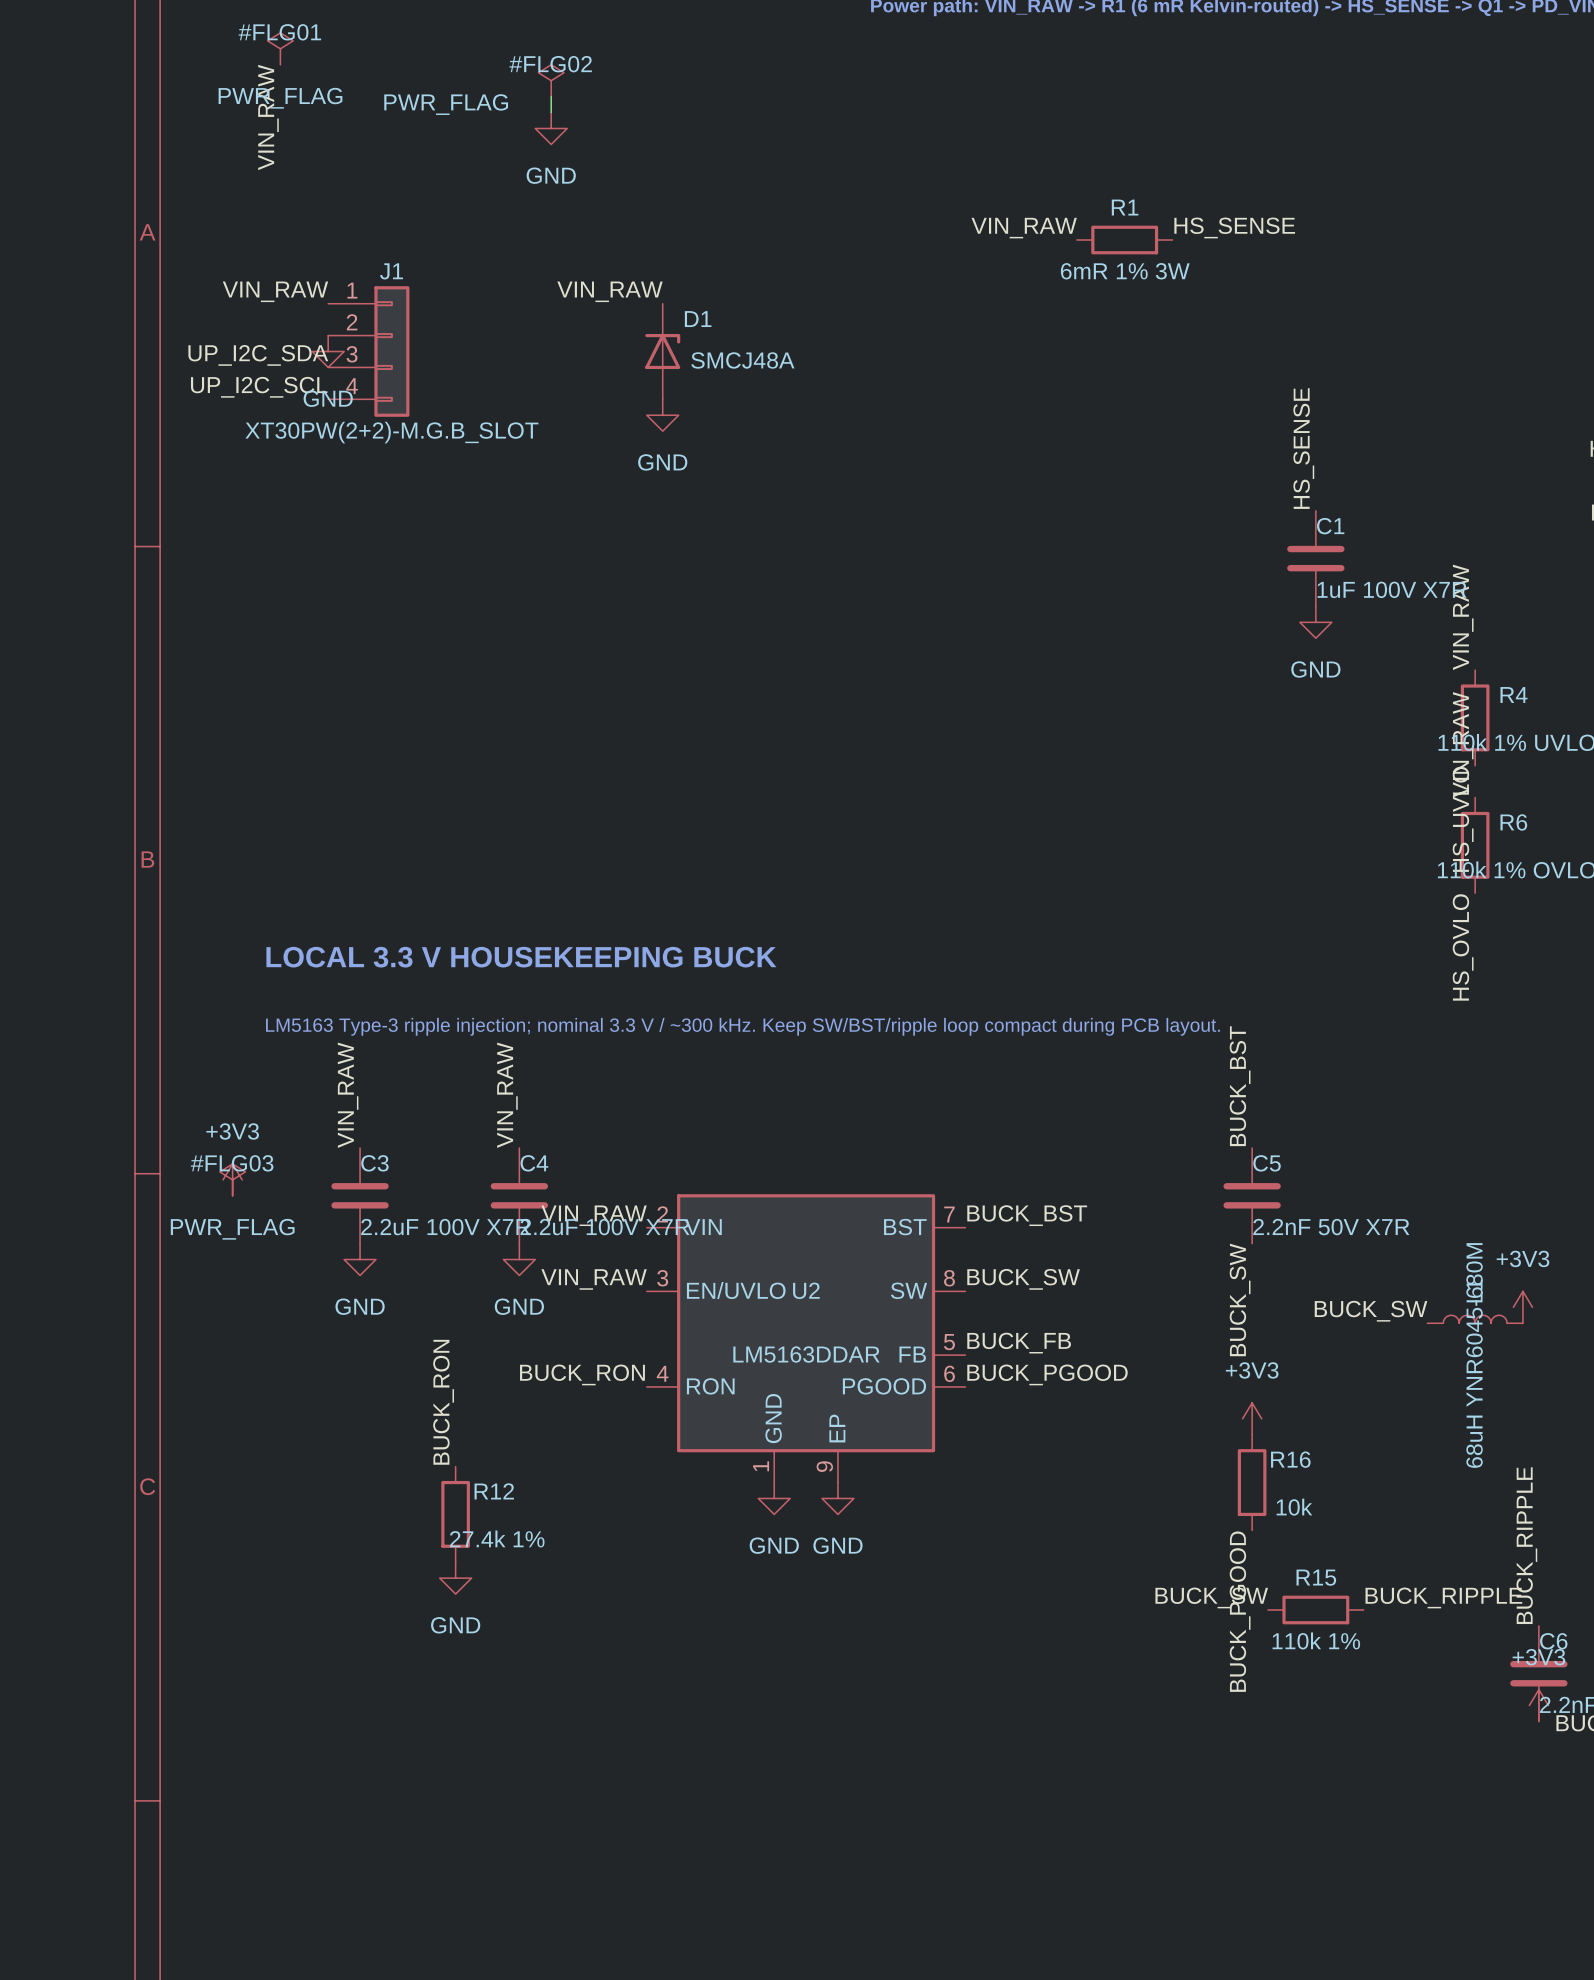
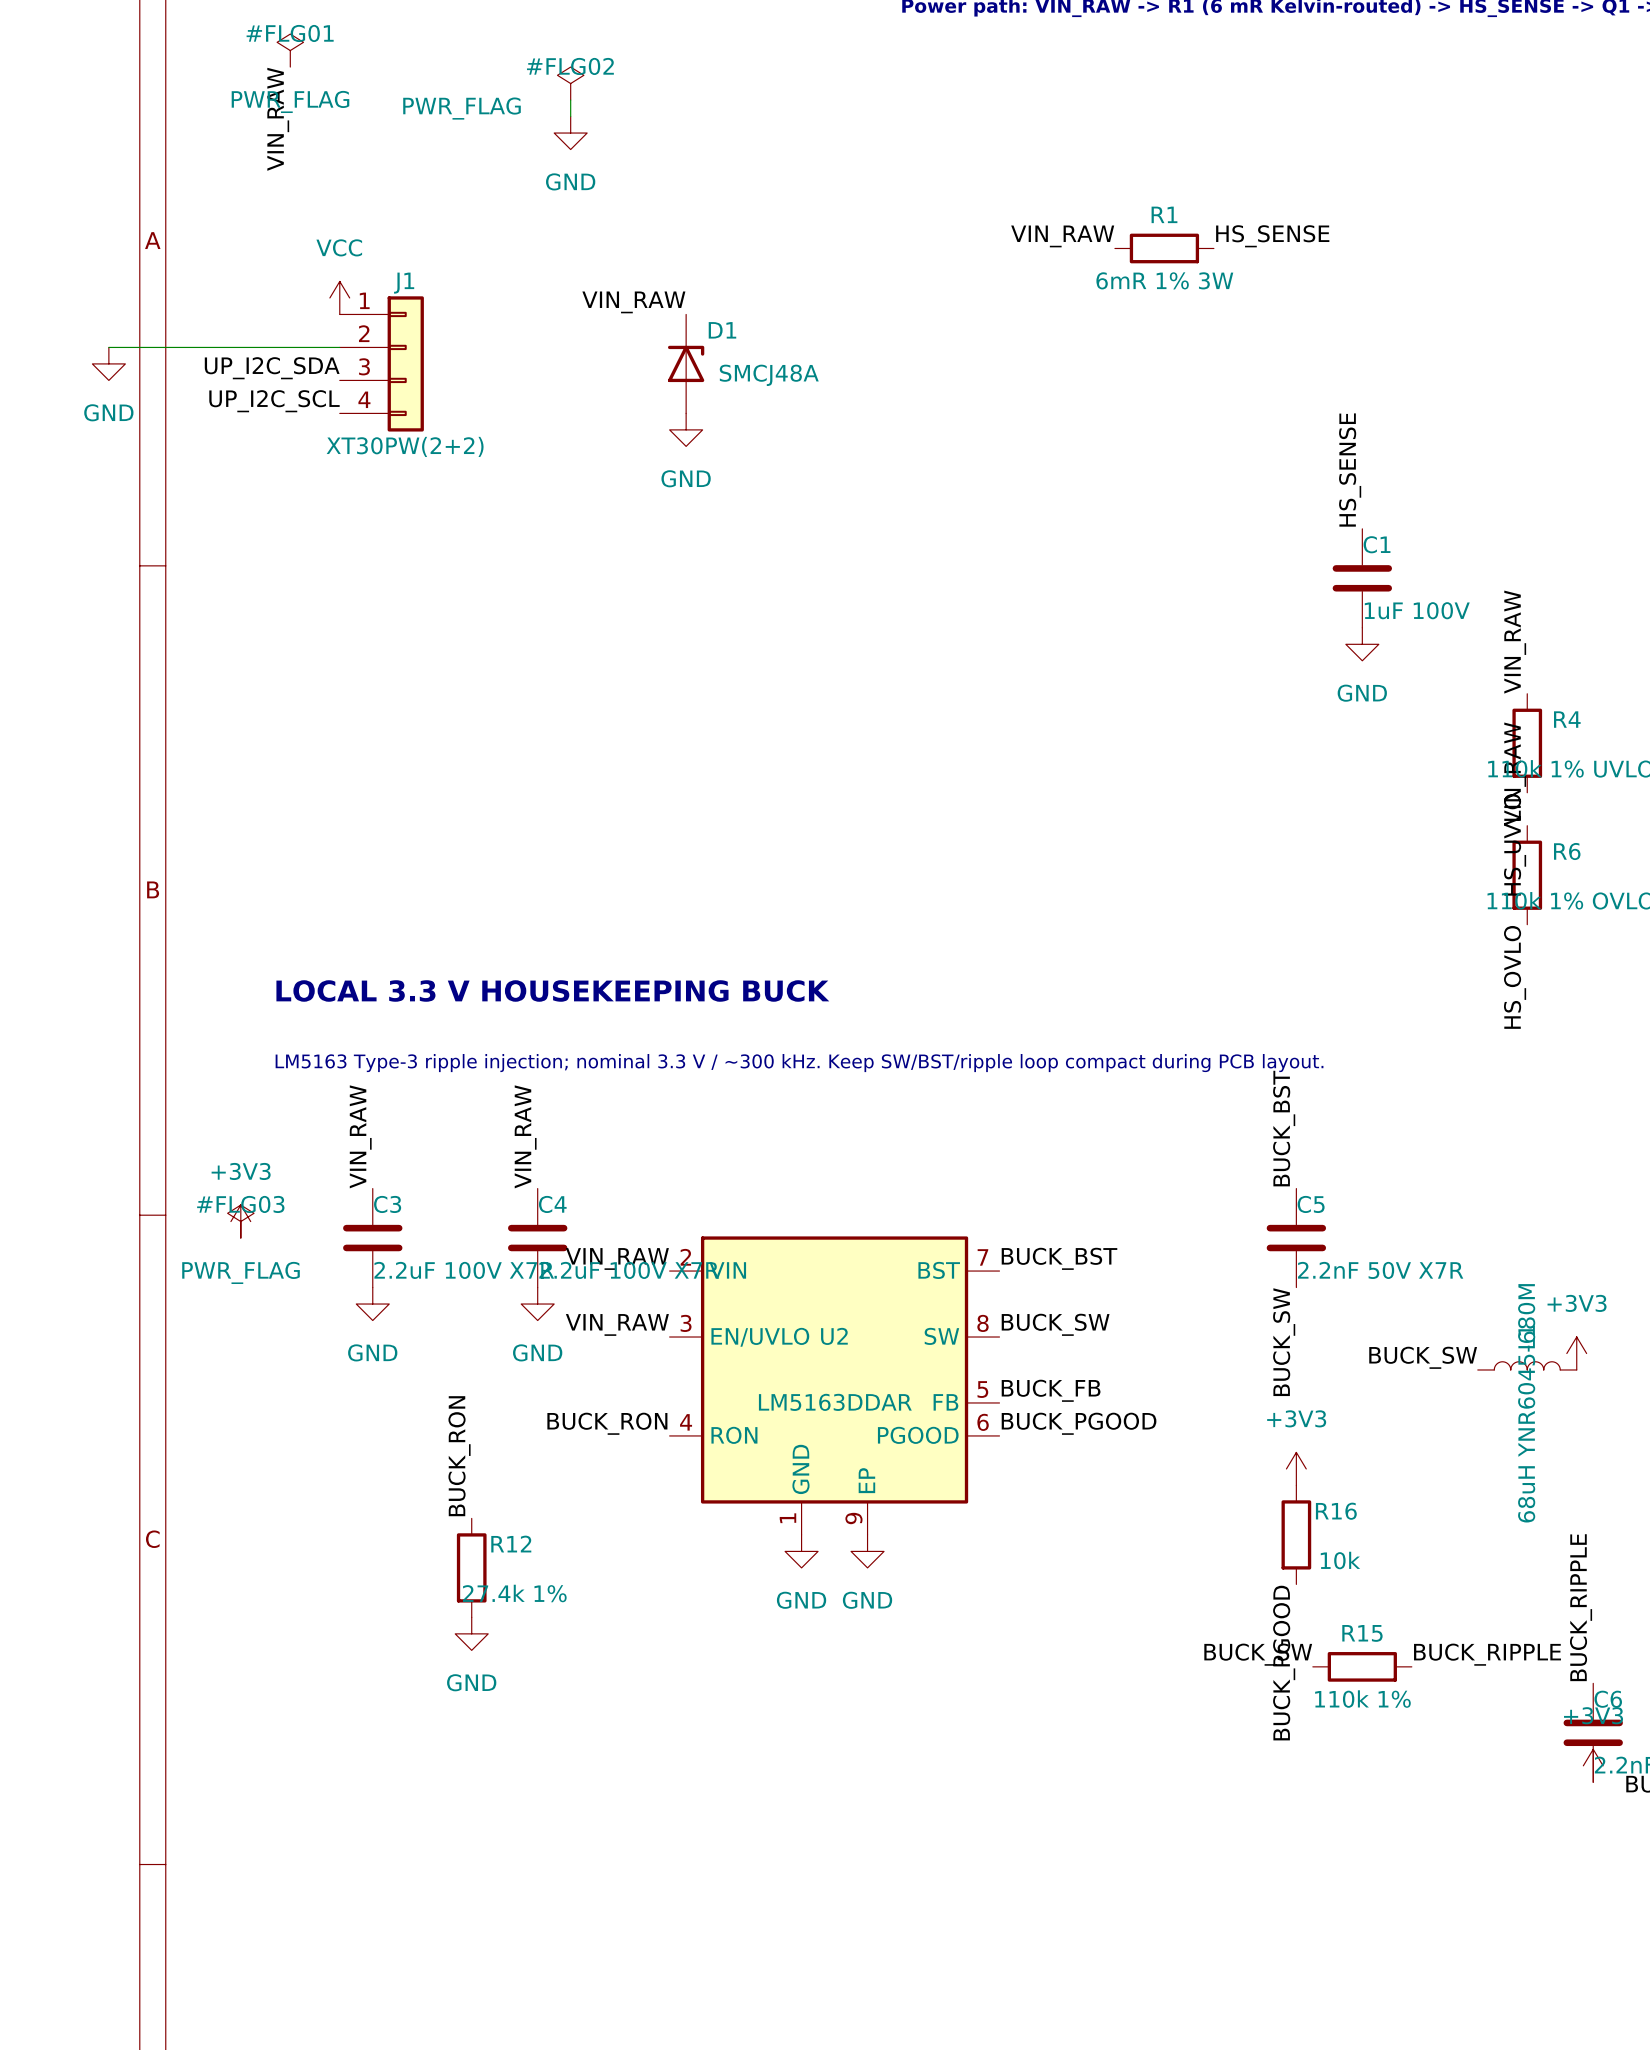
power symbol: none -> VCC (339, 297)
label: VIN_RAW (275, 291) -> none
wire: none -> (108, 347) (339, 347)
power symbol position: GND (328, 351) -> GND (108, 363)
J1 value: XT30PW(2+2)-M.G.B_SLOT (391, 432) -> XT30PW(2+2) (405, 446)
C1 value: 1uF 100V X7R (1392, 589) -> 1uF 100V (1417, 610)

